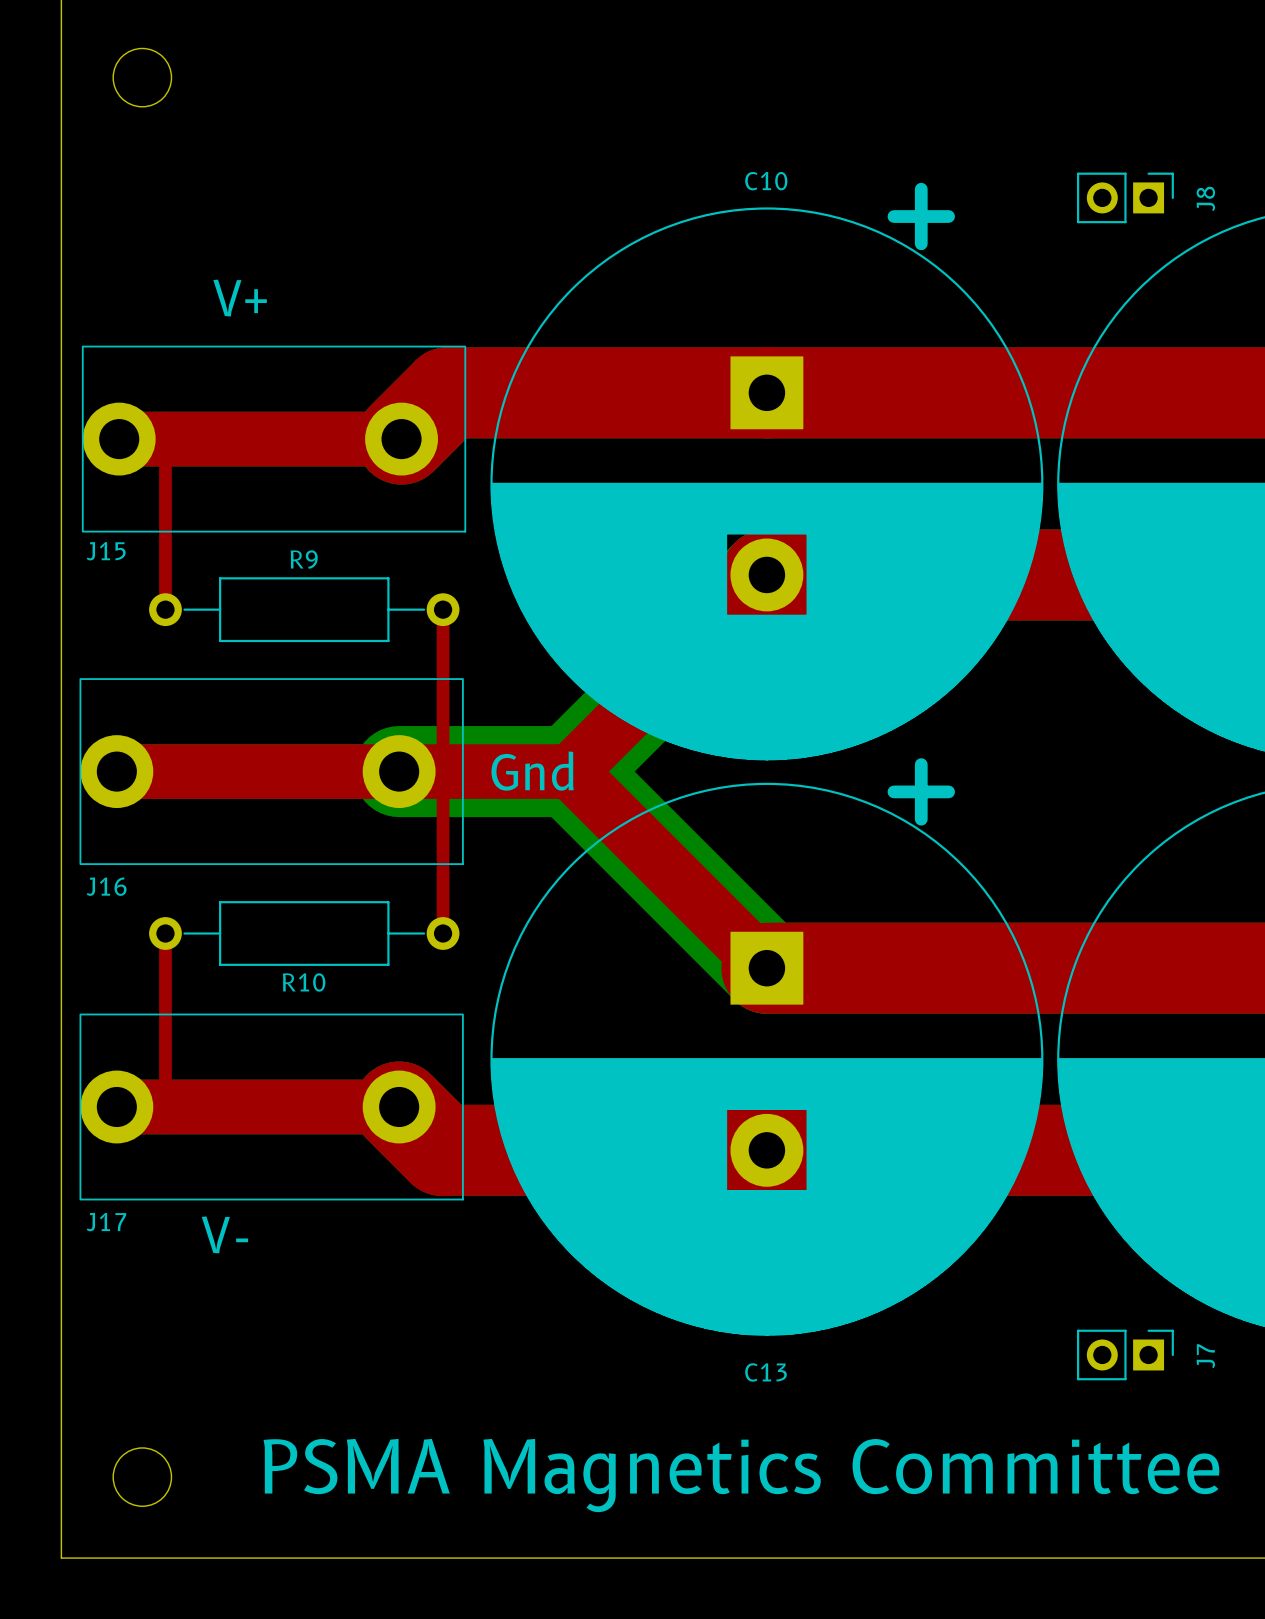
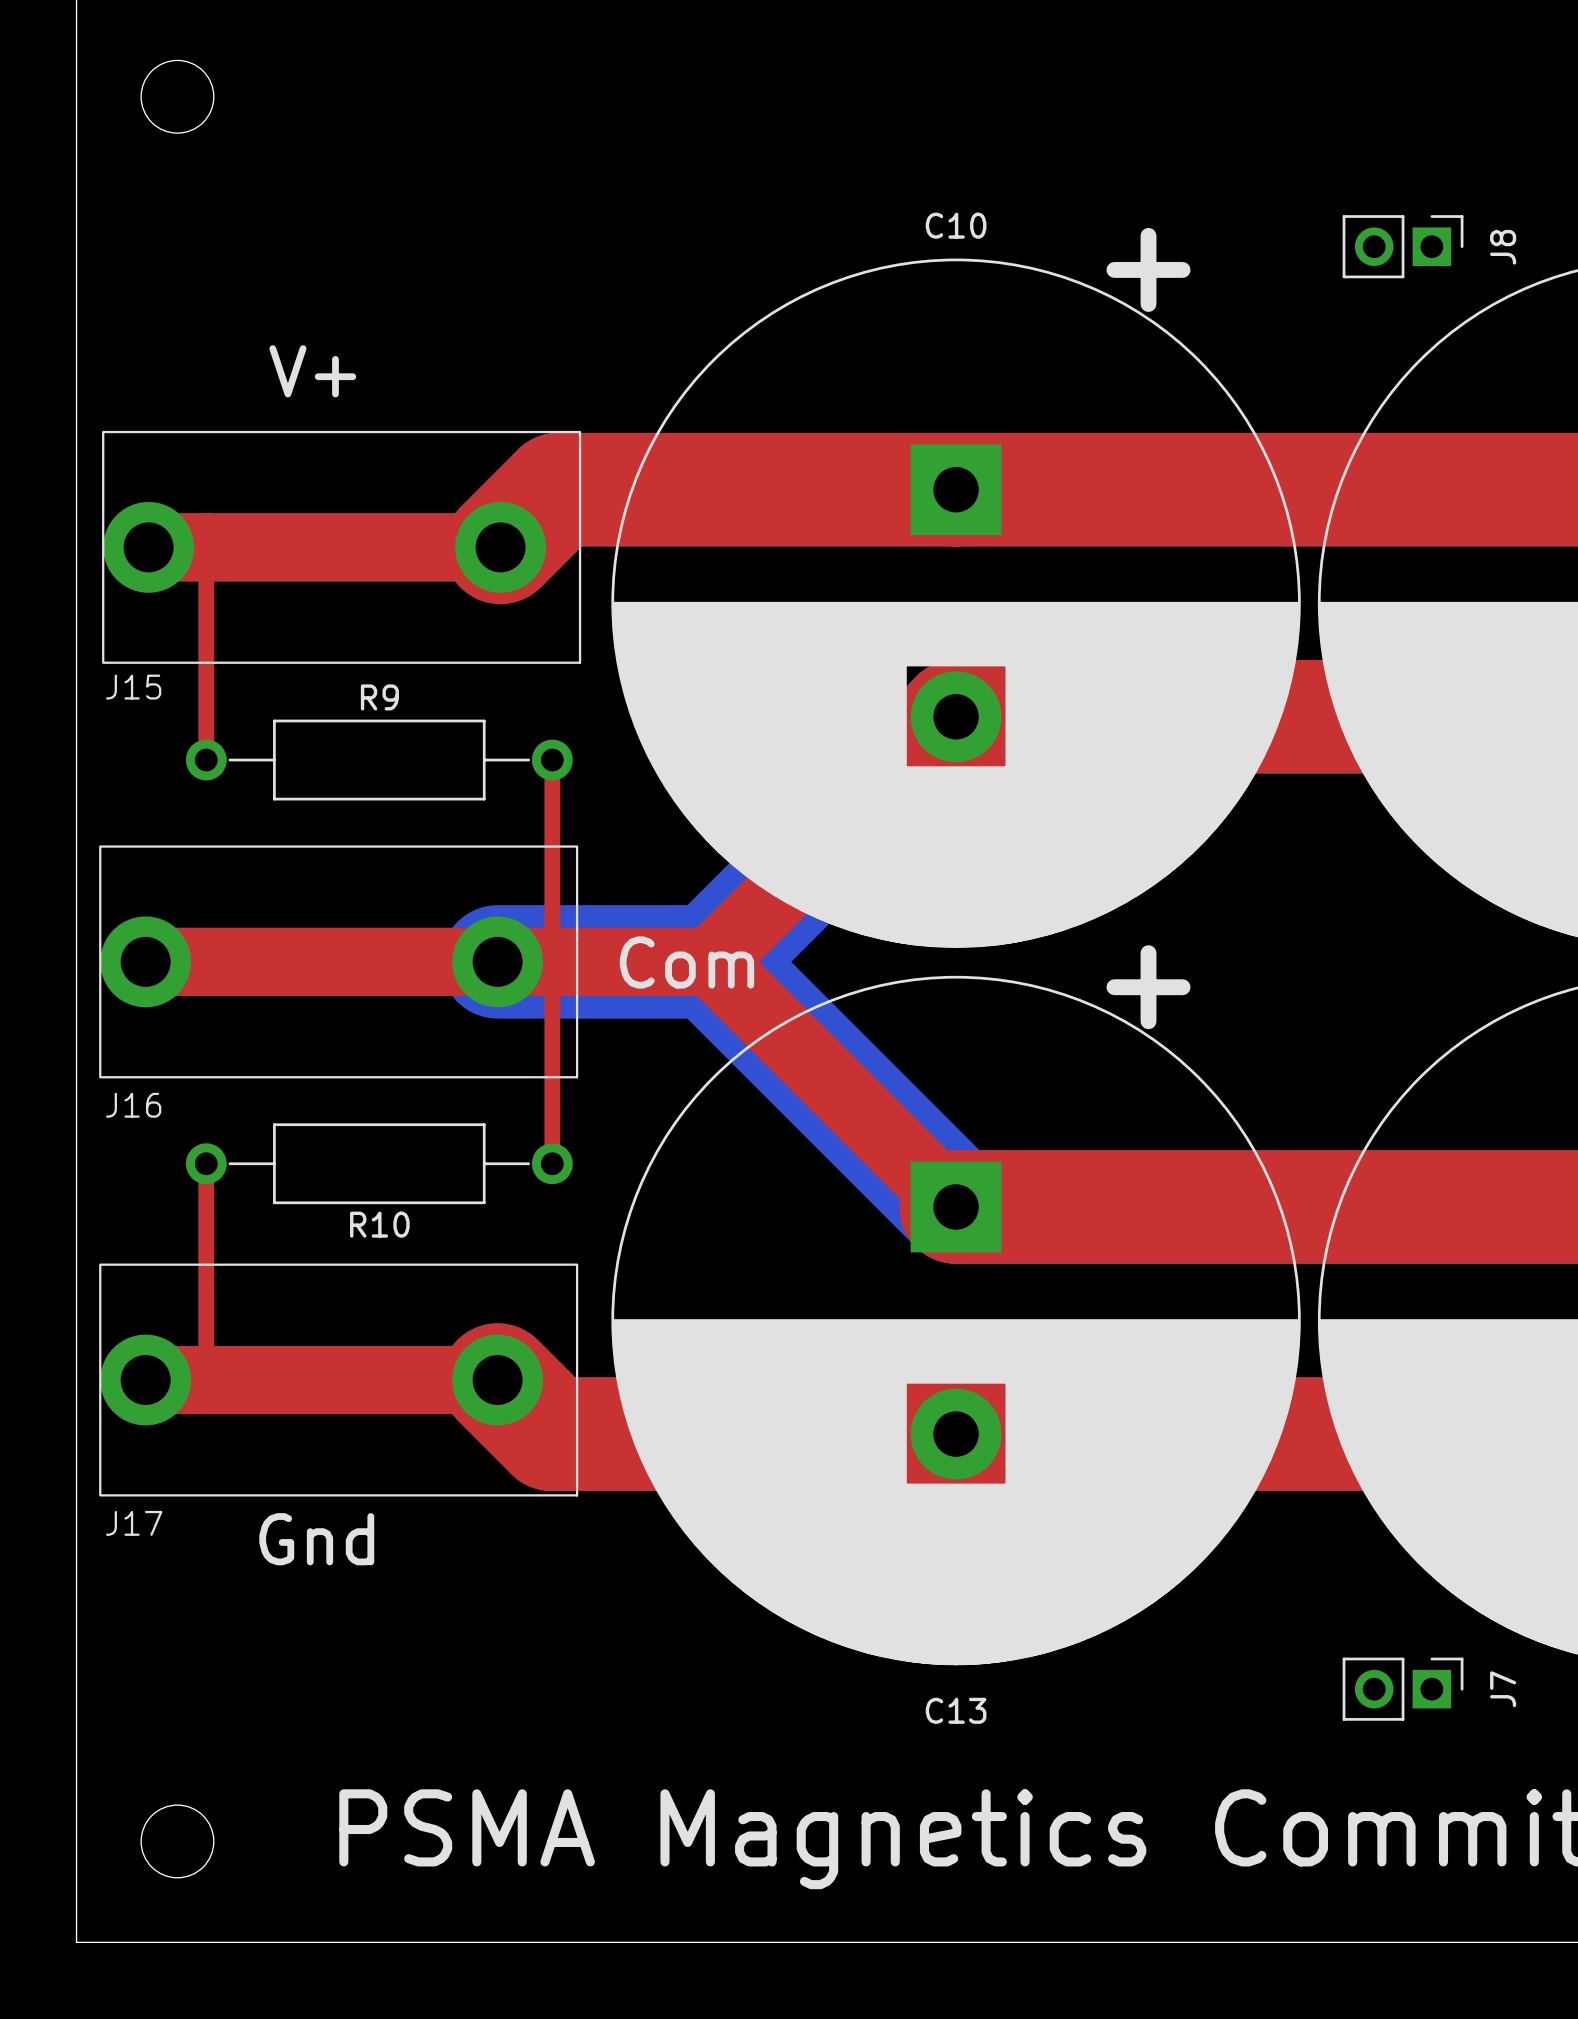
text: Gnd (532, 771) -> Com (686, 962)
text: V- (224, 1234) -> Gnd (316, 1539)

